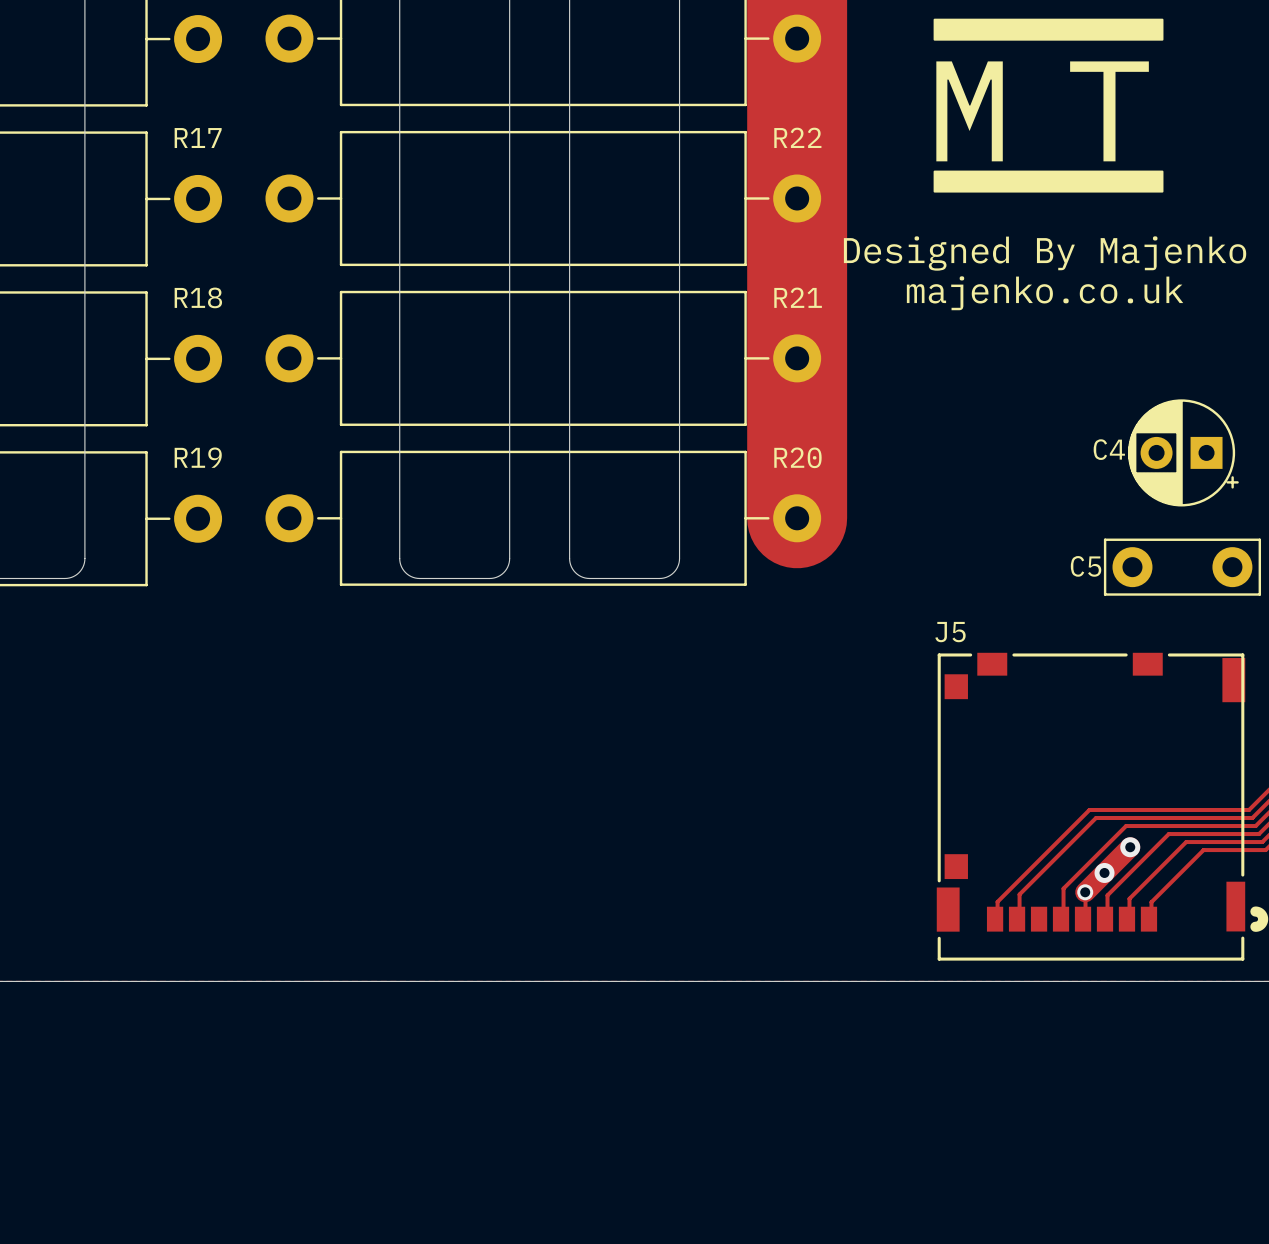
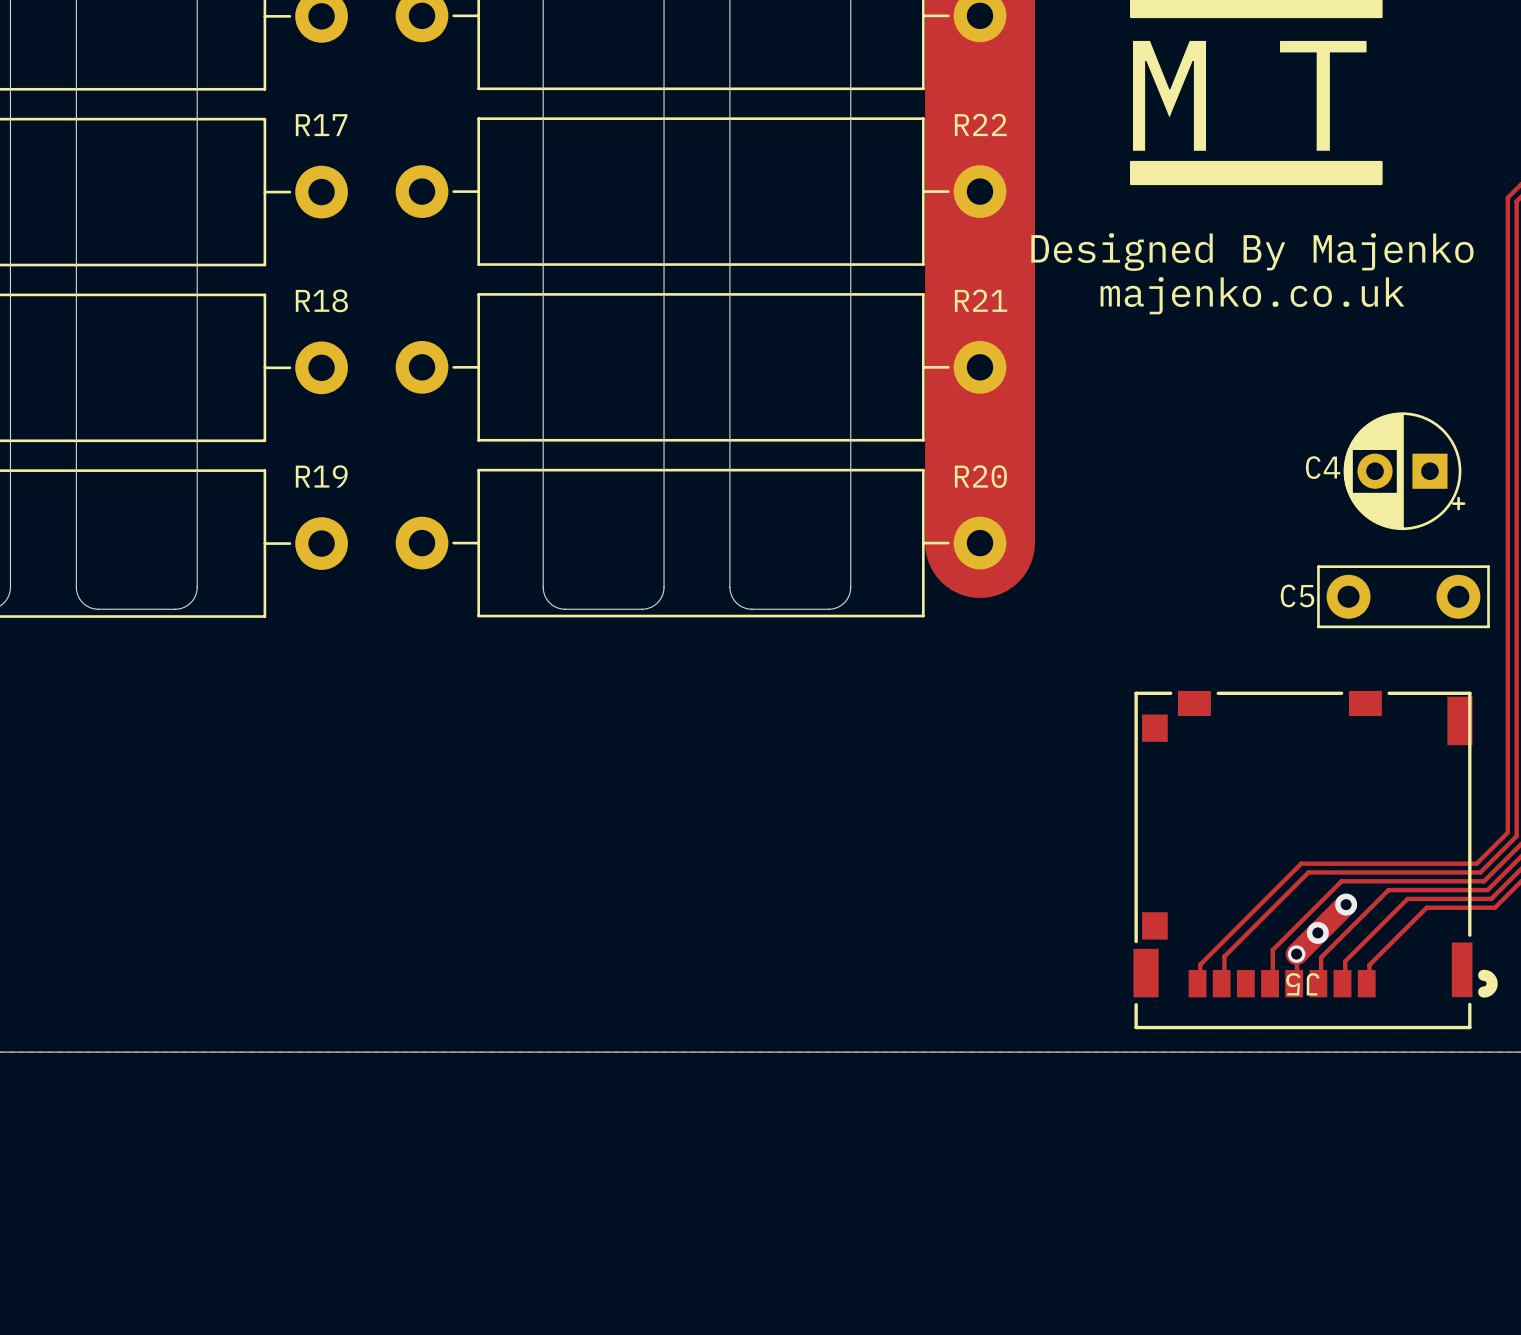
J5 name rotation: 0° (950, 632) -> 180° (1302, 984)
J5 name position: J5 (950, 632) -> J5 (1302, 984)

